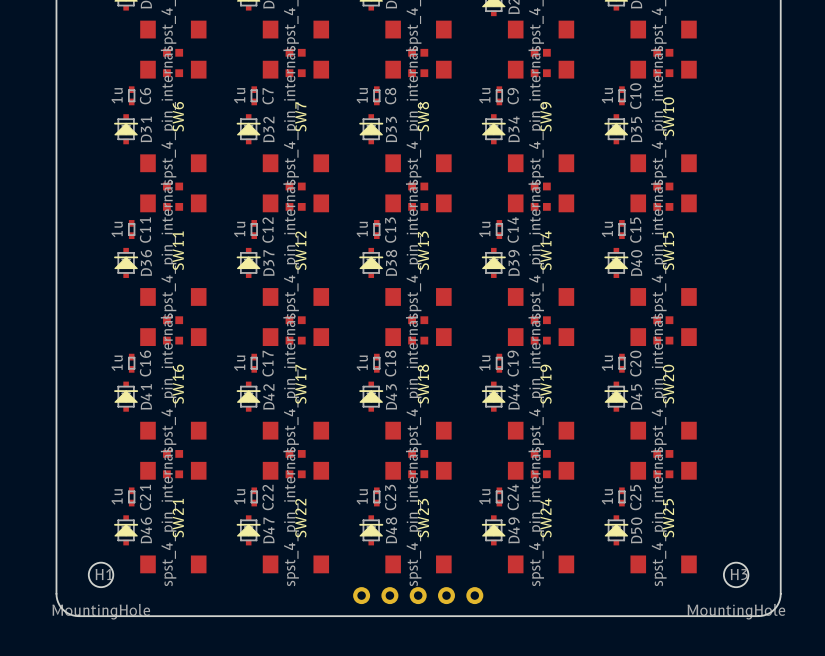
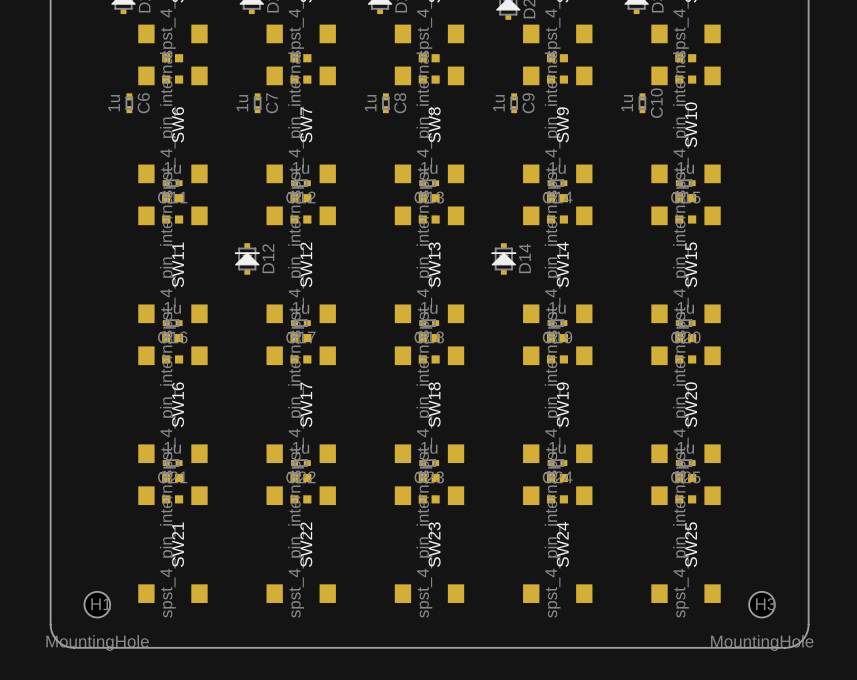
D31: (126, 129) -> none
D32: (248, 129) -> none
D33: (371, 129) -> none
D34: (493, 129) -> none
D35: (616, 129) -> none
C11 rotation: 0° (131, 229) -> 90° clockwise (172, 183)
C11 position: (131, 229) -> (172, 183)
C12 rotation: 0° (254, 229) -> 90° clockwise (300, 183)
C12 position: (254, 229) -> (300, 183)
C13 rotation: 0° (376, 229) -> 90° clockwise (429, 183)
C13 position: (376, 229) -> (429, 183)
C14 rotation: 0° (499, 229) -> 90° clockwise (557, 183)
C14 position: (499, 229) -> (557, 183)
C15 rotation: 0° (621, 229) -> 90° clockwise (685, 183)
C15 position: (621, 229) -> (685, 183)
D12: none -> (247, 258)
D14: none -> (503, 258)
D36: (126, 262) -> none
D37: (248, 262) -> none
D38: (371, 262) -> none
D39: (493, 262) -> none
D40: (616, 262) -> none
C16 rotation: 0° (131, 363) -> 90° clockwise (172, 323)
C16 position: (131, 363) -> (172, 323)
C17 rotation: 0° (254, 363) -> 90° clockwise (300, 323)
C17 position: (254, 363) -> (300, 323)
C18 rotation: 0° (376, 363) -> 90° clockwise (429, 323)
C18 position: (376, 363) -> (429, 323)
C19 rotation: 0° (499, 363) -> 90° clockwise (557, 323)
C19 position: (499, 363) -> (557, 323)
C20 rotation: 0° (621, 363) -> 90° clockwise (685, 323)
C20 position: (621, 363) -> (685, 323)
D41: (126, 396) -> none
D42: (248, 396) -> none
D43: (371, 396) -> none
D44: (493, 396) -> none
D45: (616, 396) -> none
C21 rotation: 0° (131, 496) -> 90° clockwise (172, 463)
C21 position: (131, 496) -> (172, 463)
C22 rotation: 0° (254, 496) -> 90° clockwise (300, 463)
C22 position: (254, 496) -> (300, 463)
C23 rotation: 0° (376, 496) -> 90° clockwise (429, 463)
C23 position: (376, 496) -> (429, 463)
C24 rotation: 0° (499, 496) -> 90° clockwise (557, 463)
C24 position: (499, 496) -> (557, 463)
C25 rotation: 0° (621, 496) -> 90° clockwise (685, 463)
C25 position: (621, 496) -> (685, 463)
D46: (126, 530) -> none
D47: (248, 530) -> none
D48: (371, 530) -> none
D49: (493, 530) -> none
D50: (616, 530) -> none
part: (418, 595) -> none

